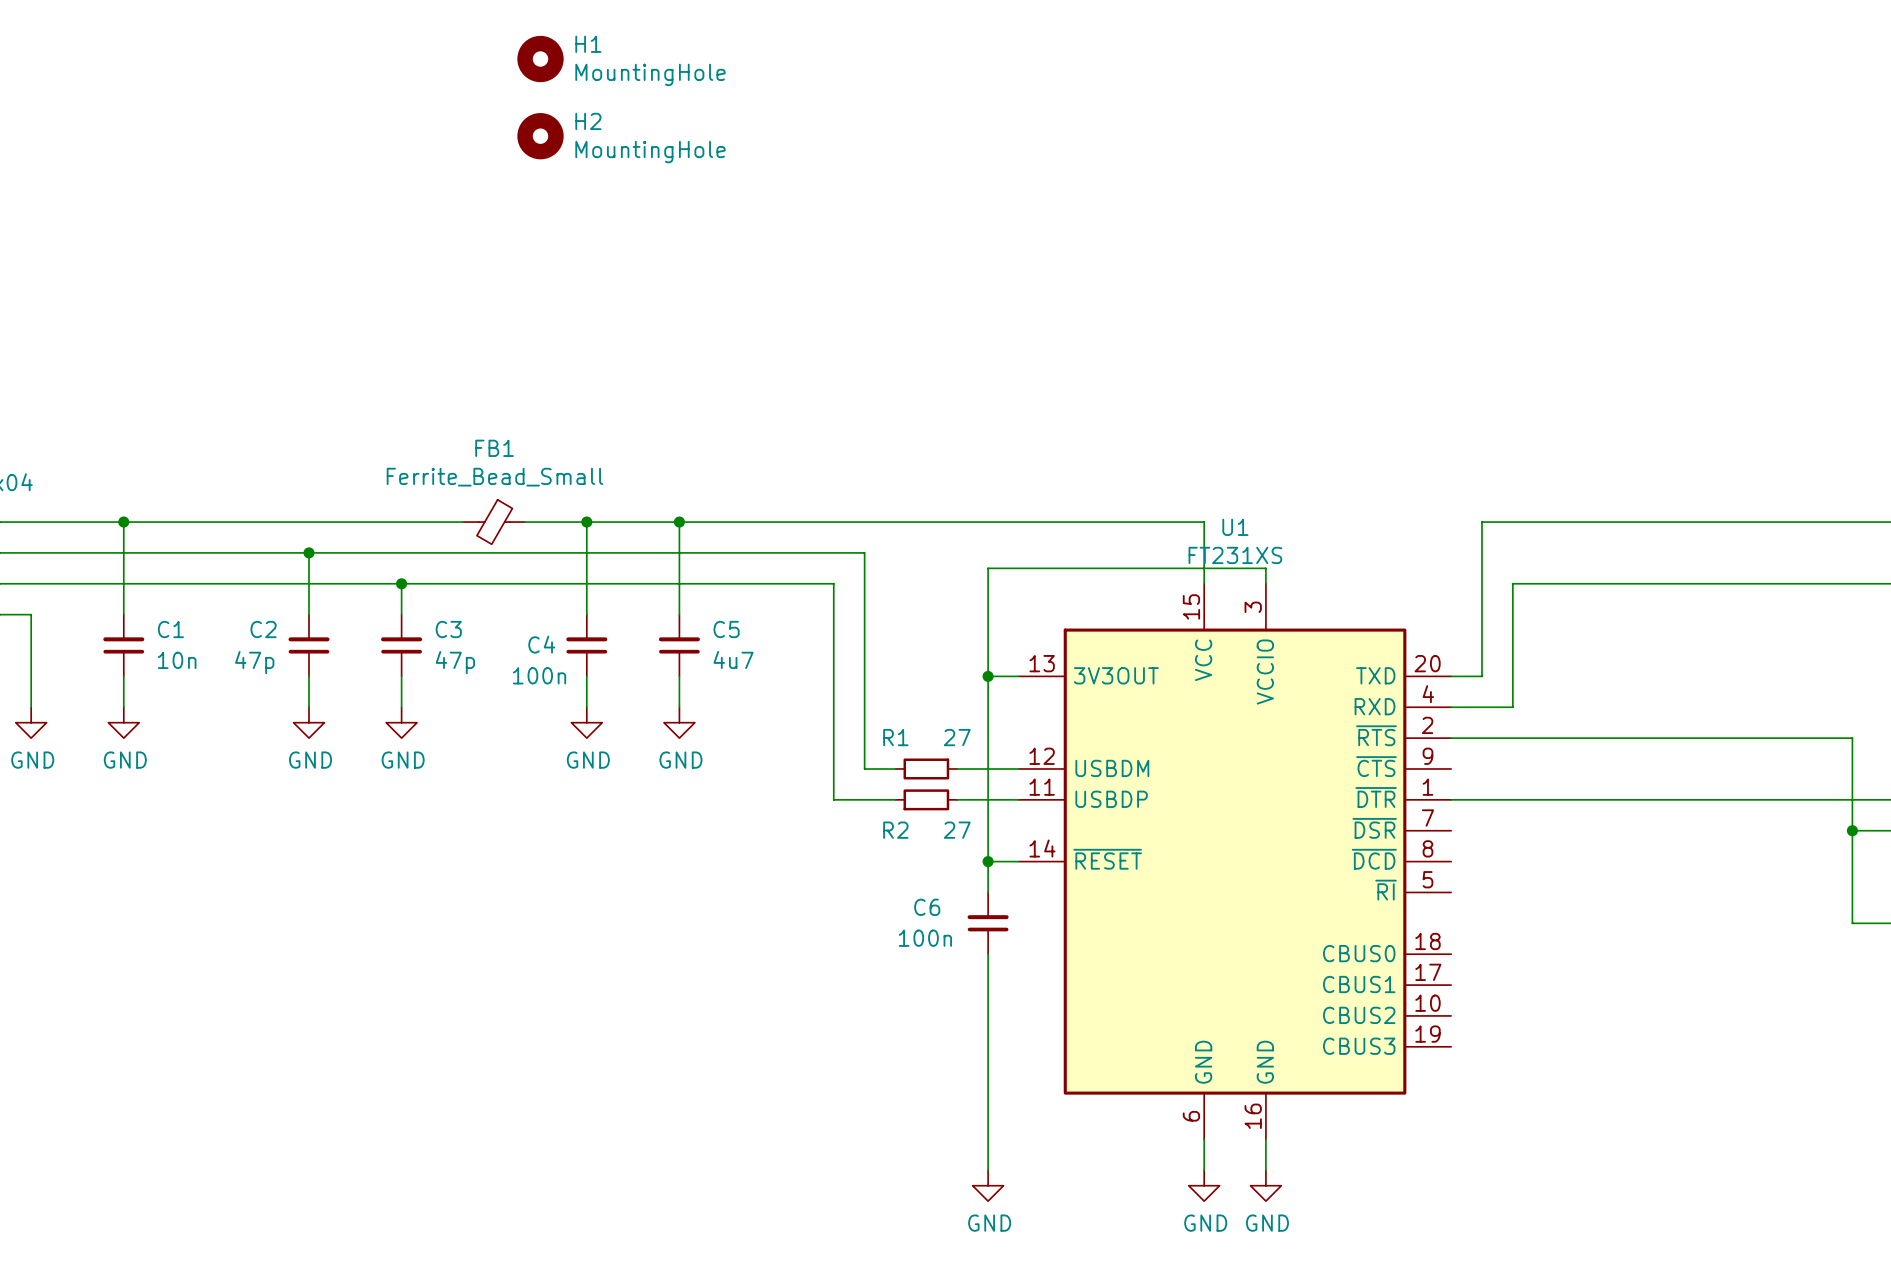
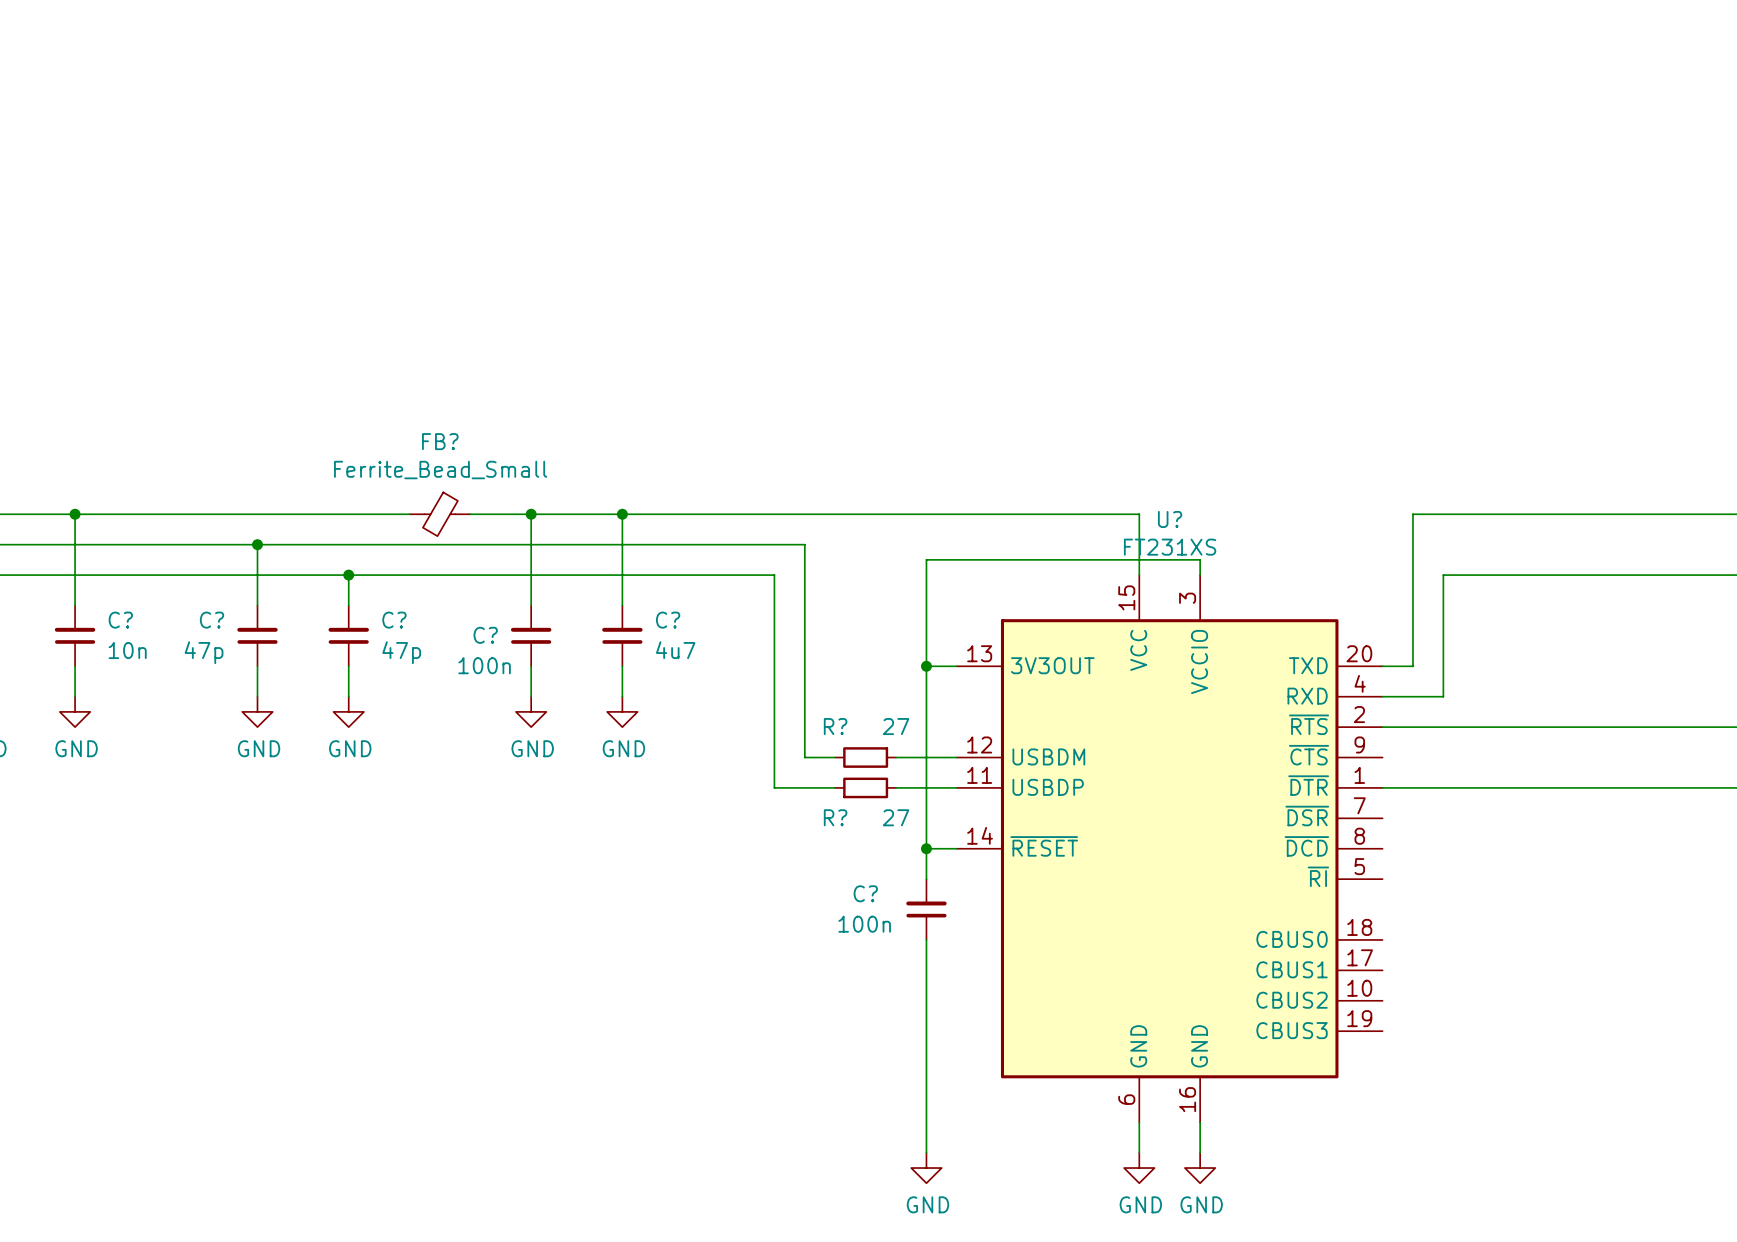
H1: MountingHole (540, 59) -> none
H2: MountingHole (540, 136) -> none
FB1 name: FB1 (494, 448) -> FB? (440, 441)
U1 name: U1 (1235, 527) -> U? (1170, 519)
C1 name: C1 (170, 629) -> C? (120, 620)
C2 name: C2 (263, 629) -> C? (212, 620)
C3 name: C3 (448, 629) -> C? (394, 620)
C5 name: C5 (726, 629) -> C? (668, 620)
C4 name: C4 (541, 644) -> C? (485, 635)
R1 name: R1 (895, 737) -> R? (835, 726)
R2 name: R2 (895, 830) -> R? (835, 817)
C6 name: C6 (927, 907) -> C? (865, 893)

